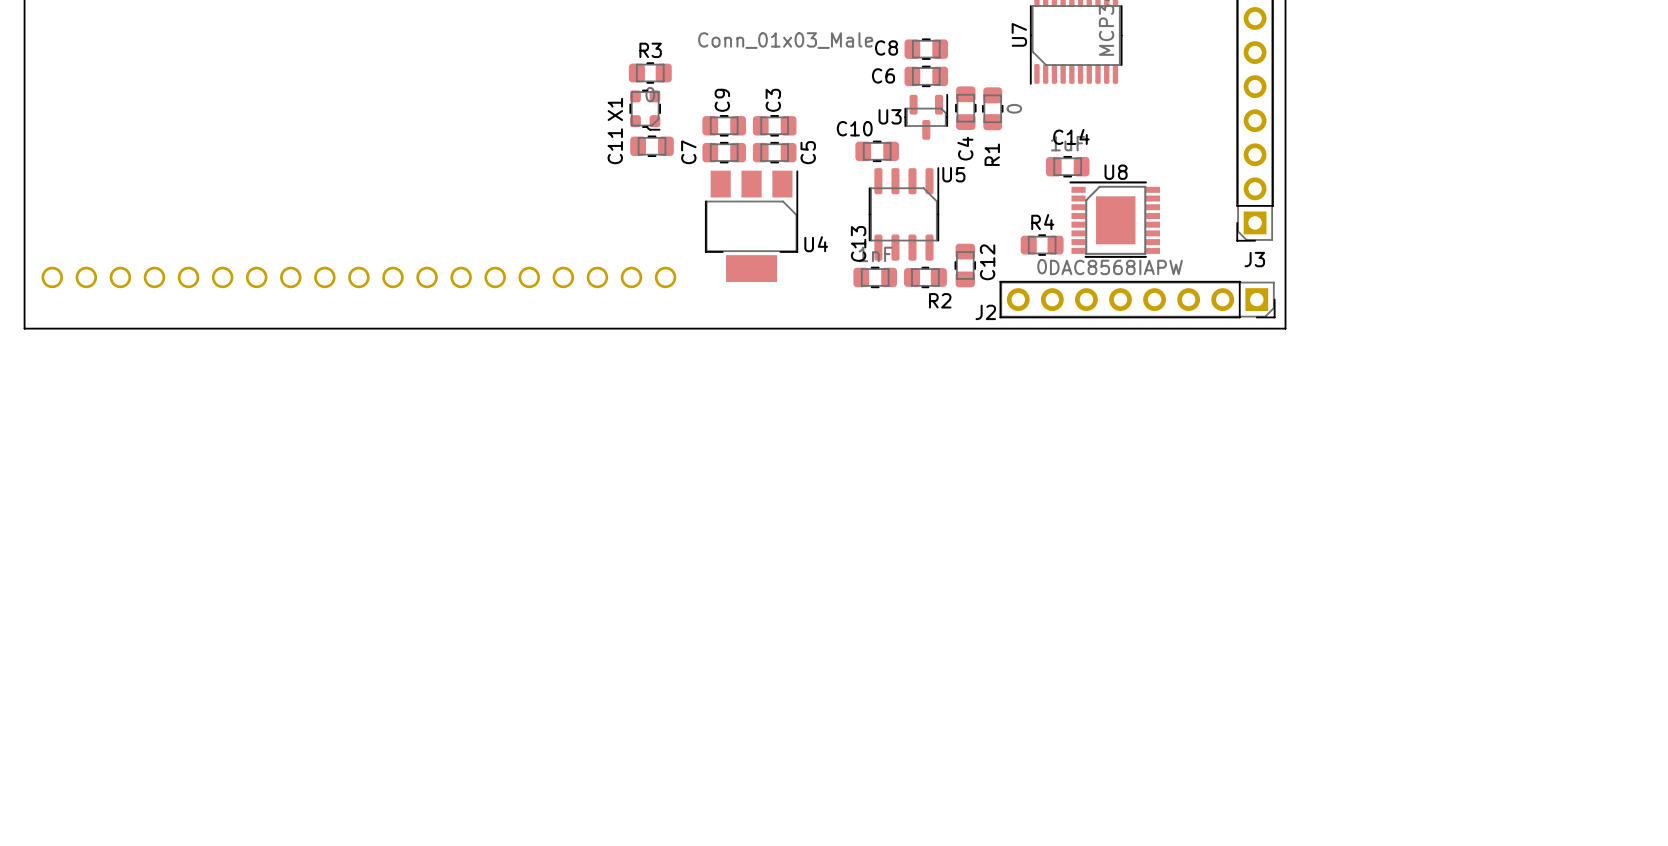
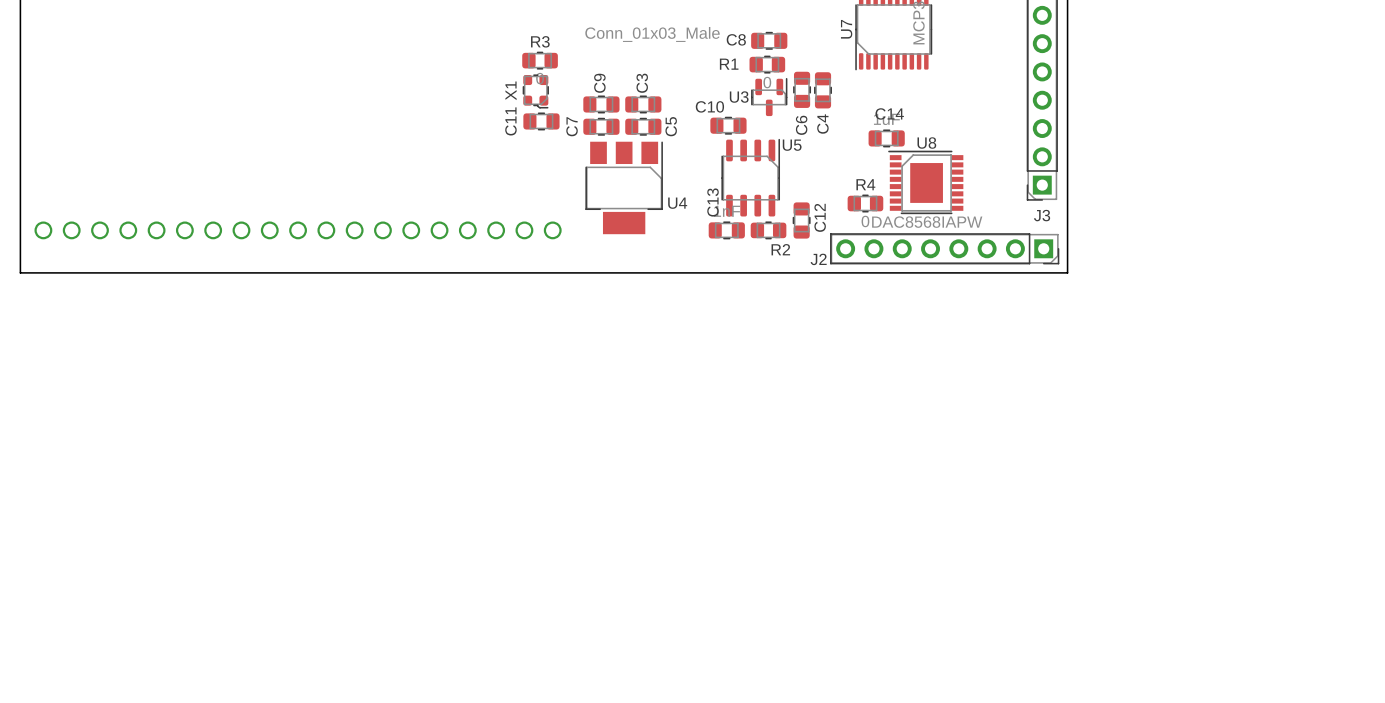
C6: (926, 76) -> none
C4: none -> (823, 90)
R1 rotation: 0° (992, 108) -> 90° clockwise (767, 64)
R1 position: (992, 108) -> (767, 64)
C4 name: C4 (965, 148) -> C6 (801, 125)

